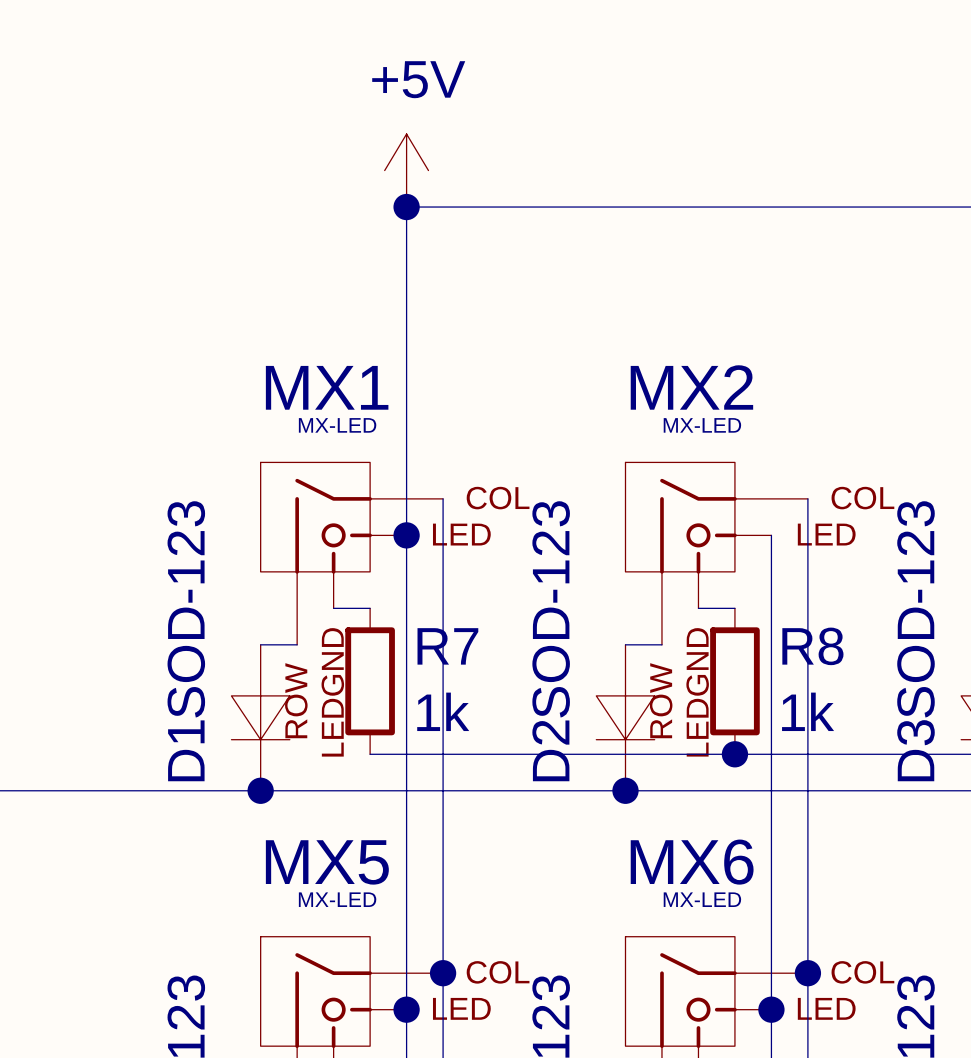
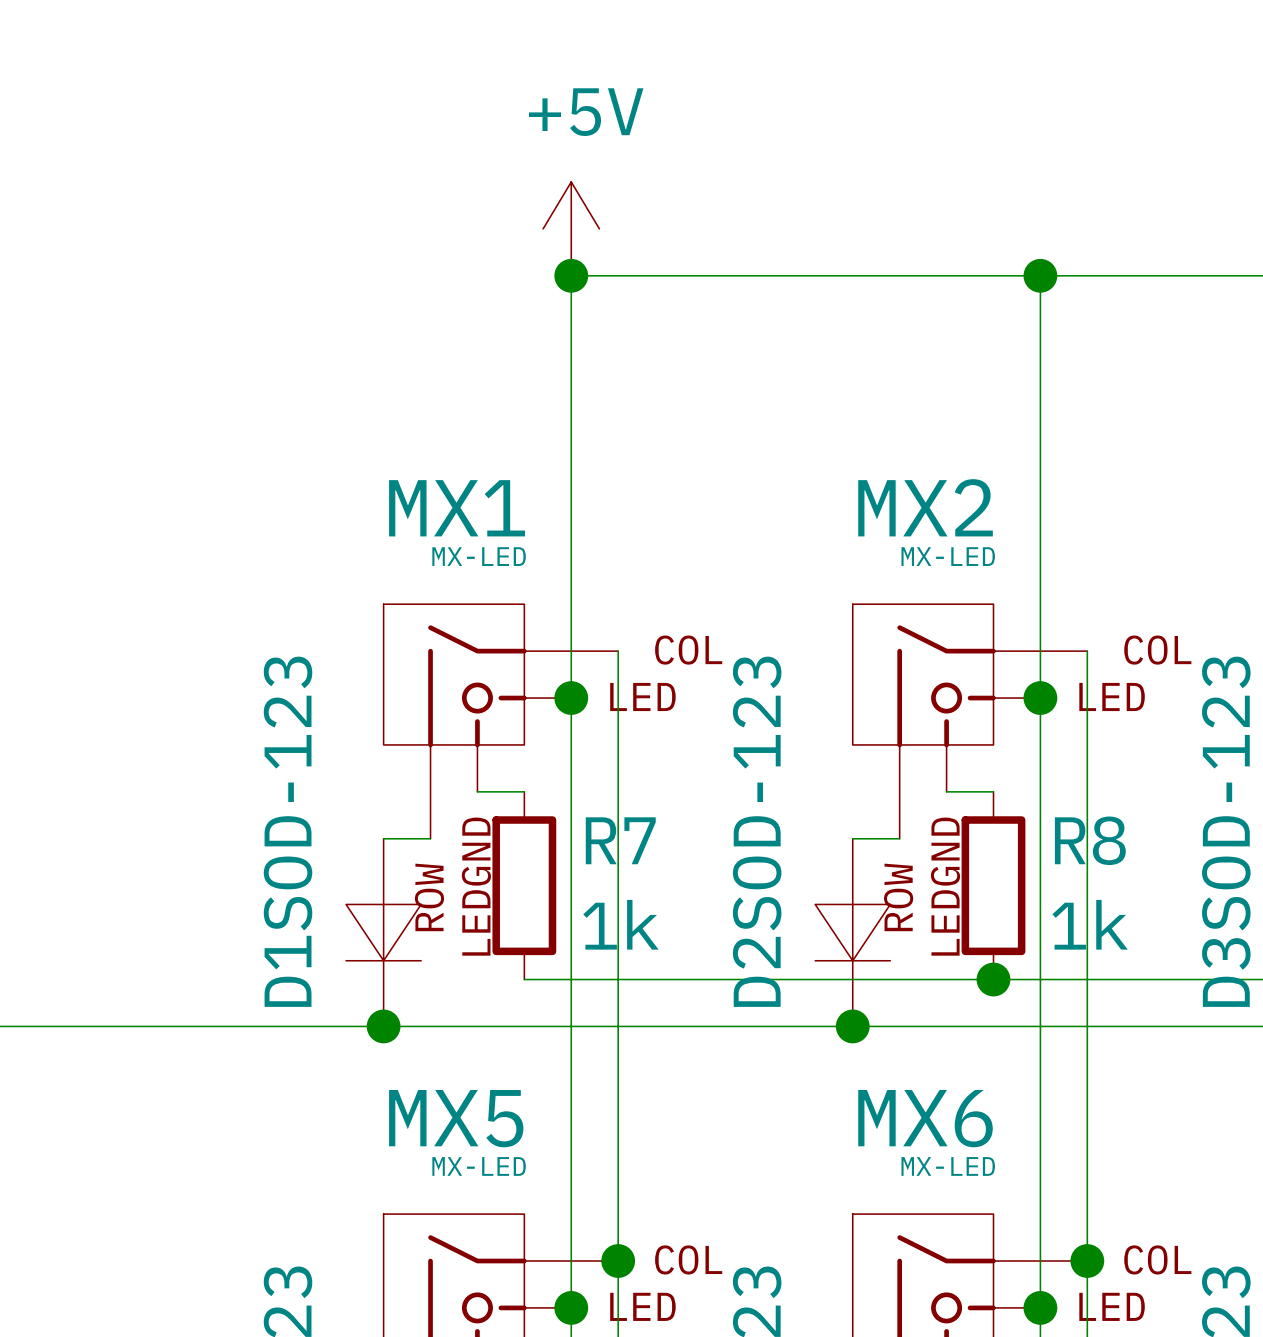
wire: none -> (1040, 275) (1040, 698)
junction: none -> (1040, 275)
junction: none -> (1040, 698)

